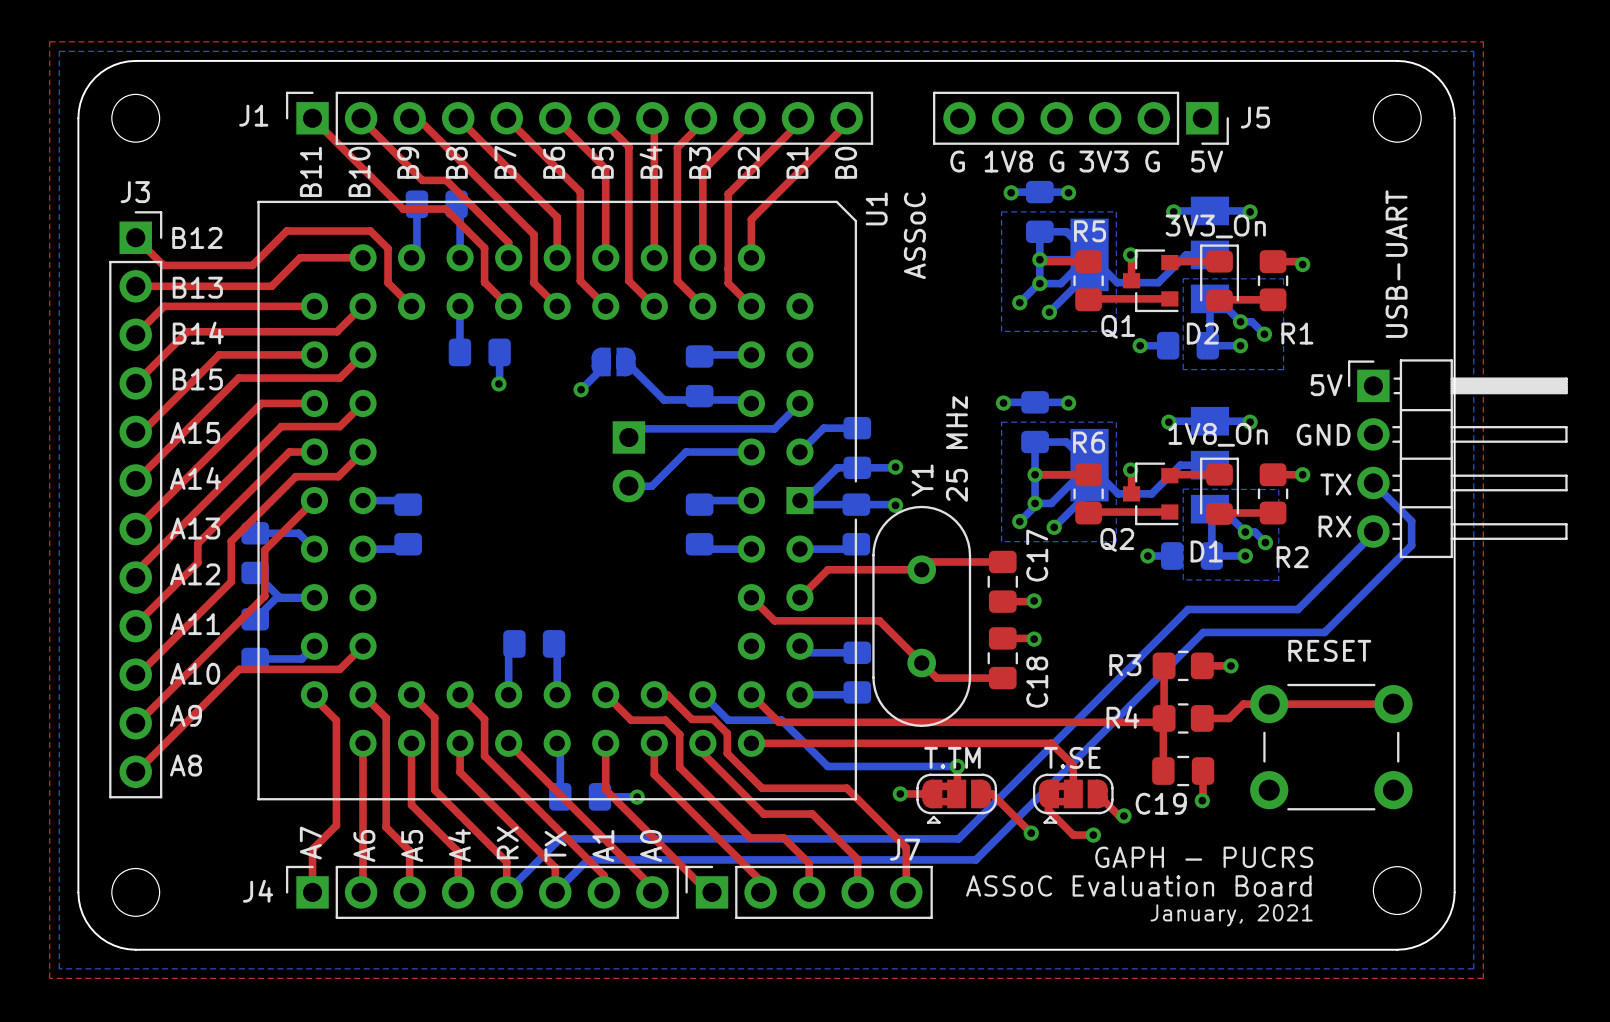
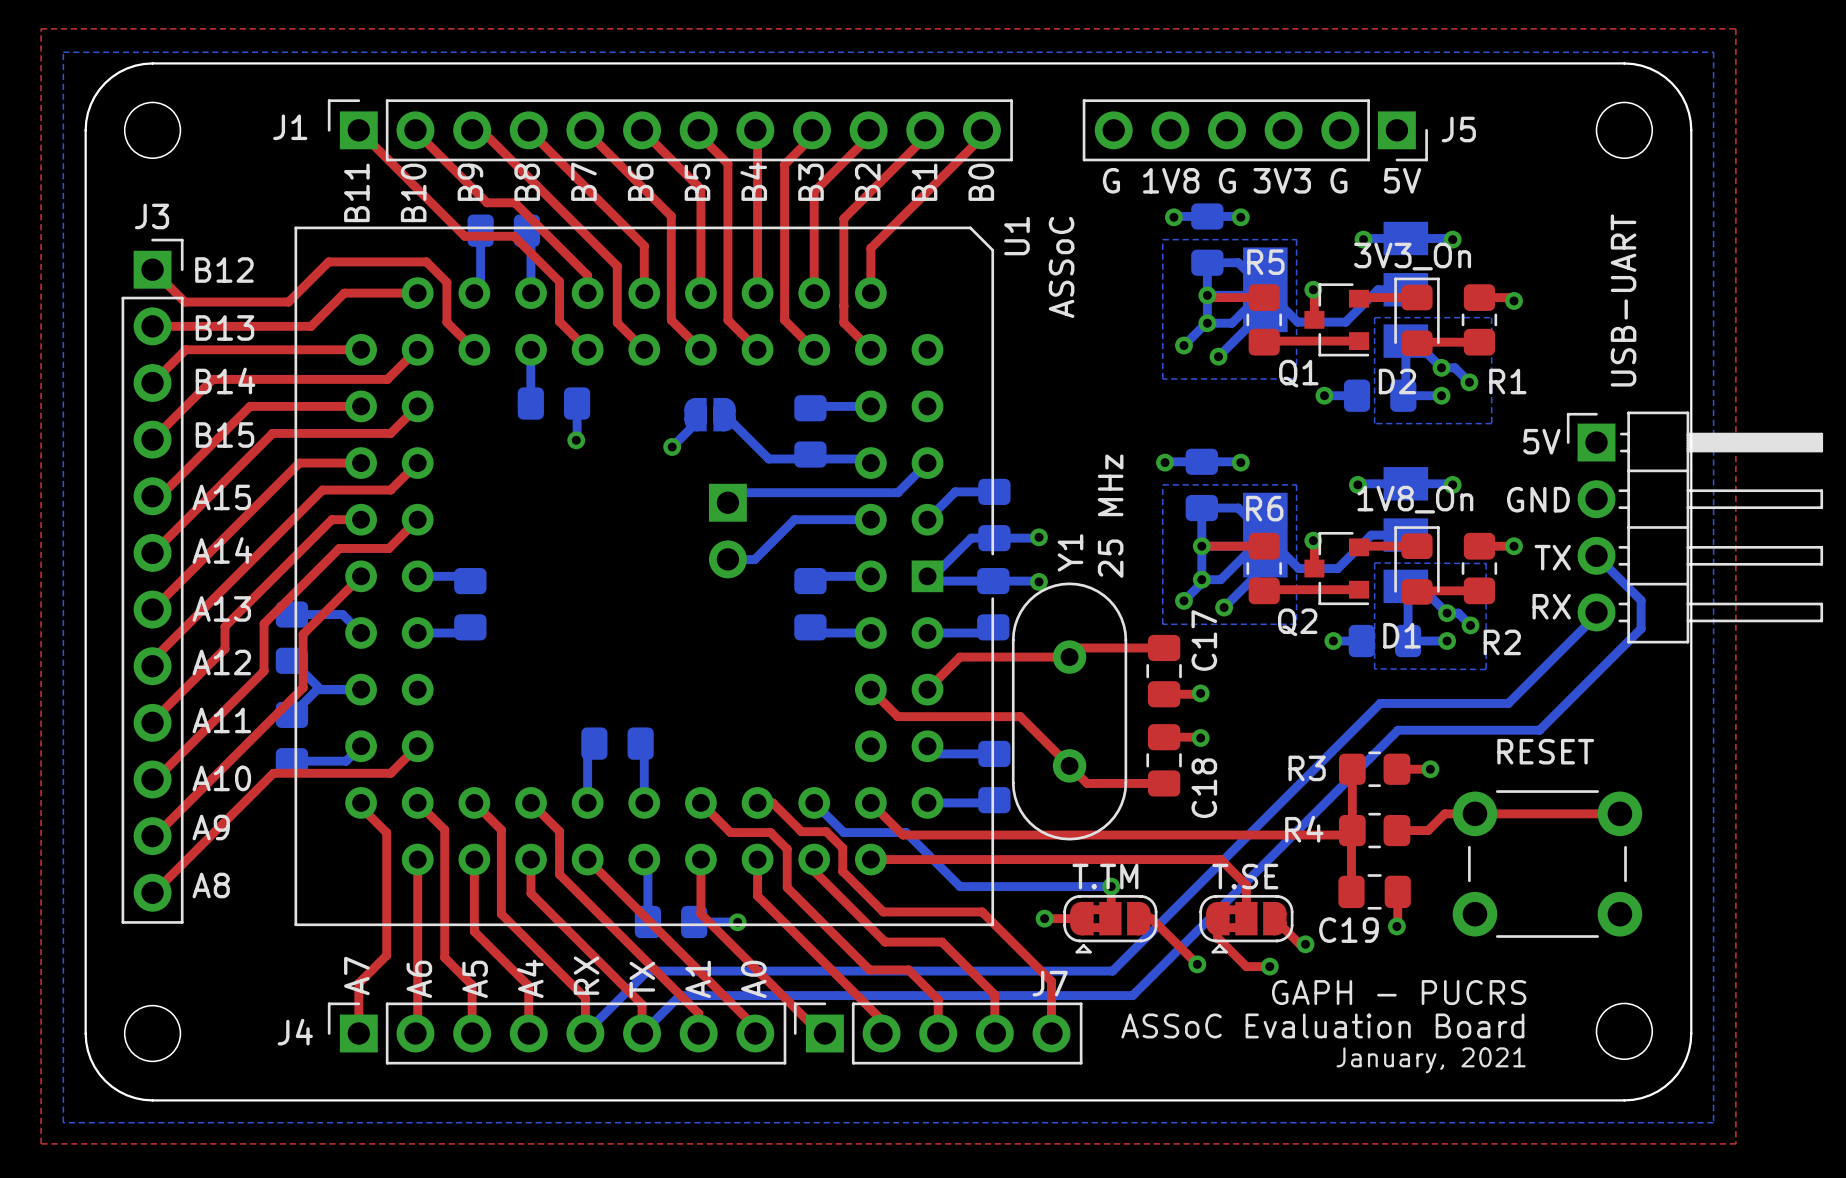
top zone outline: (49, 41) (49, 978) (1483, 978) (1483, 41) (49, 41) -> (41, 28) (41, 1143) (1735, 1143) (1735, 28) (41, 28)

